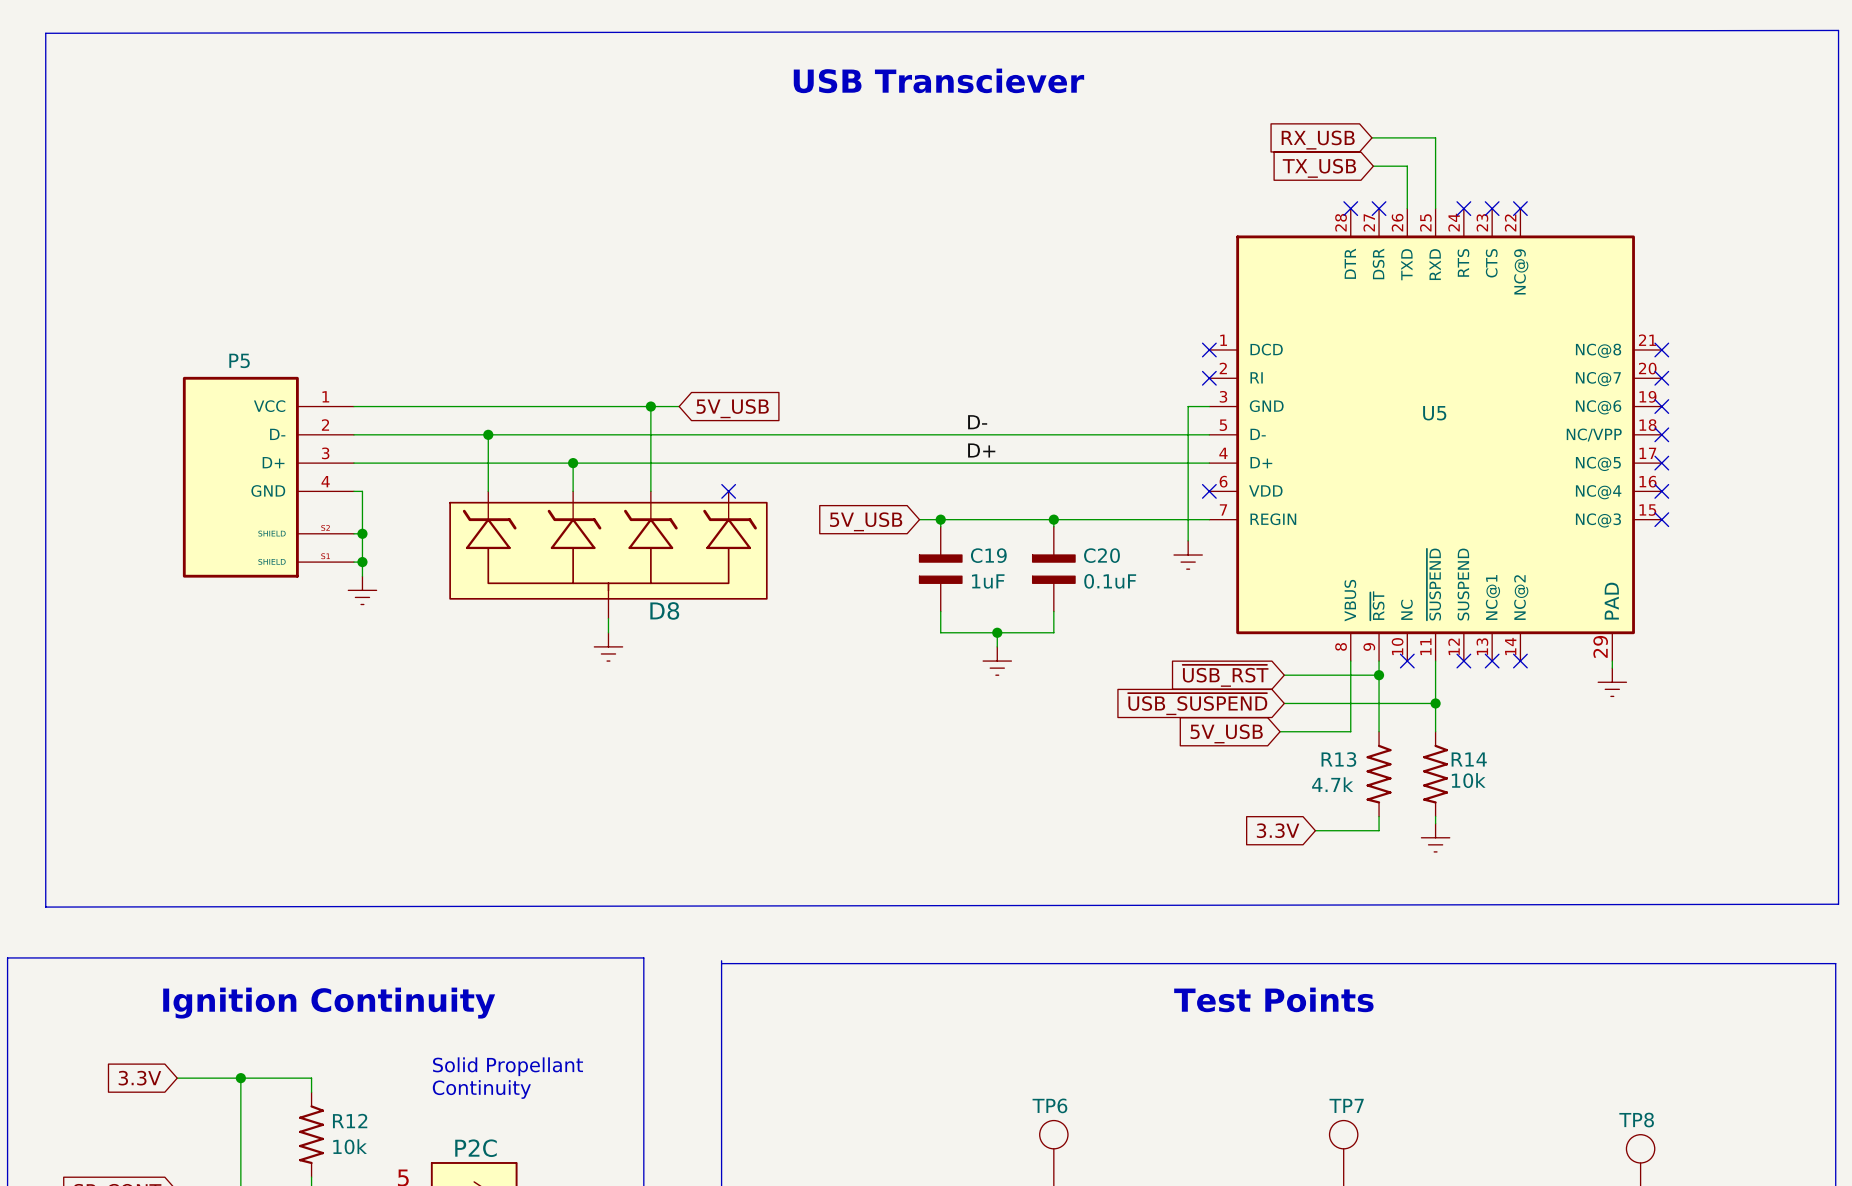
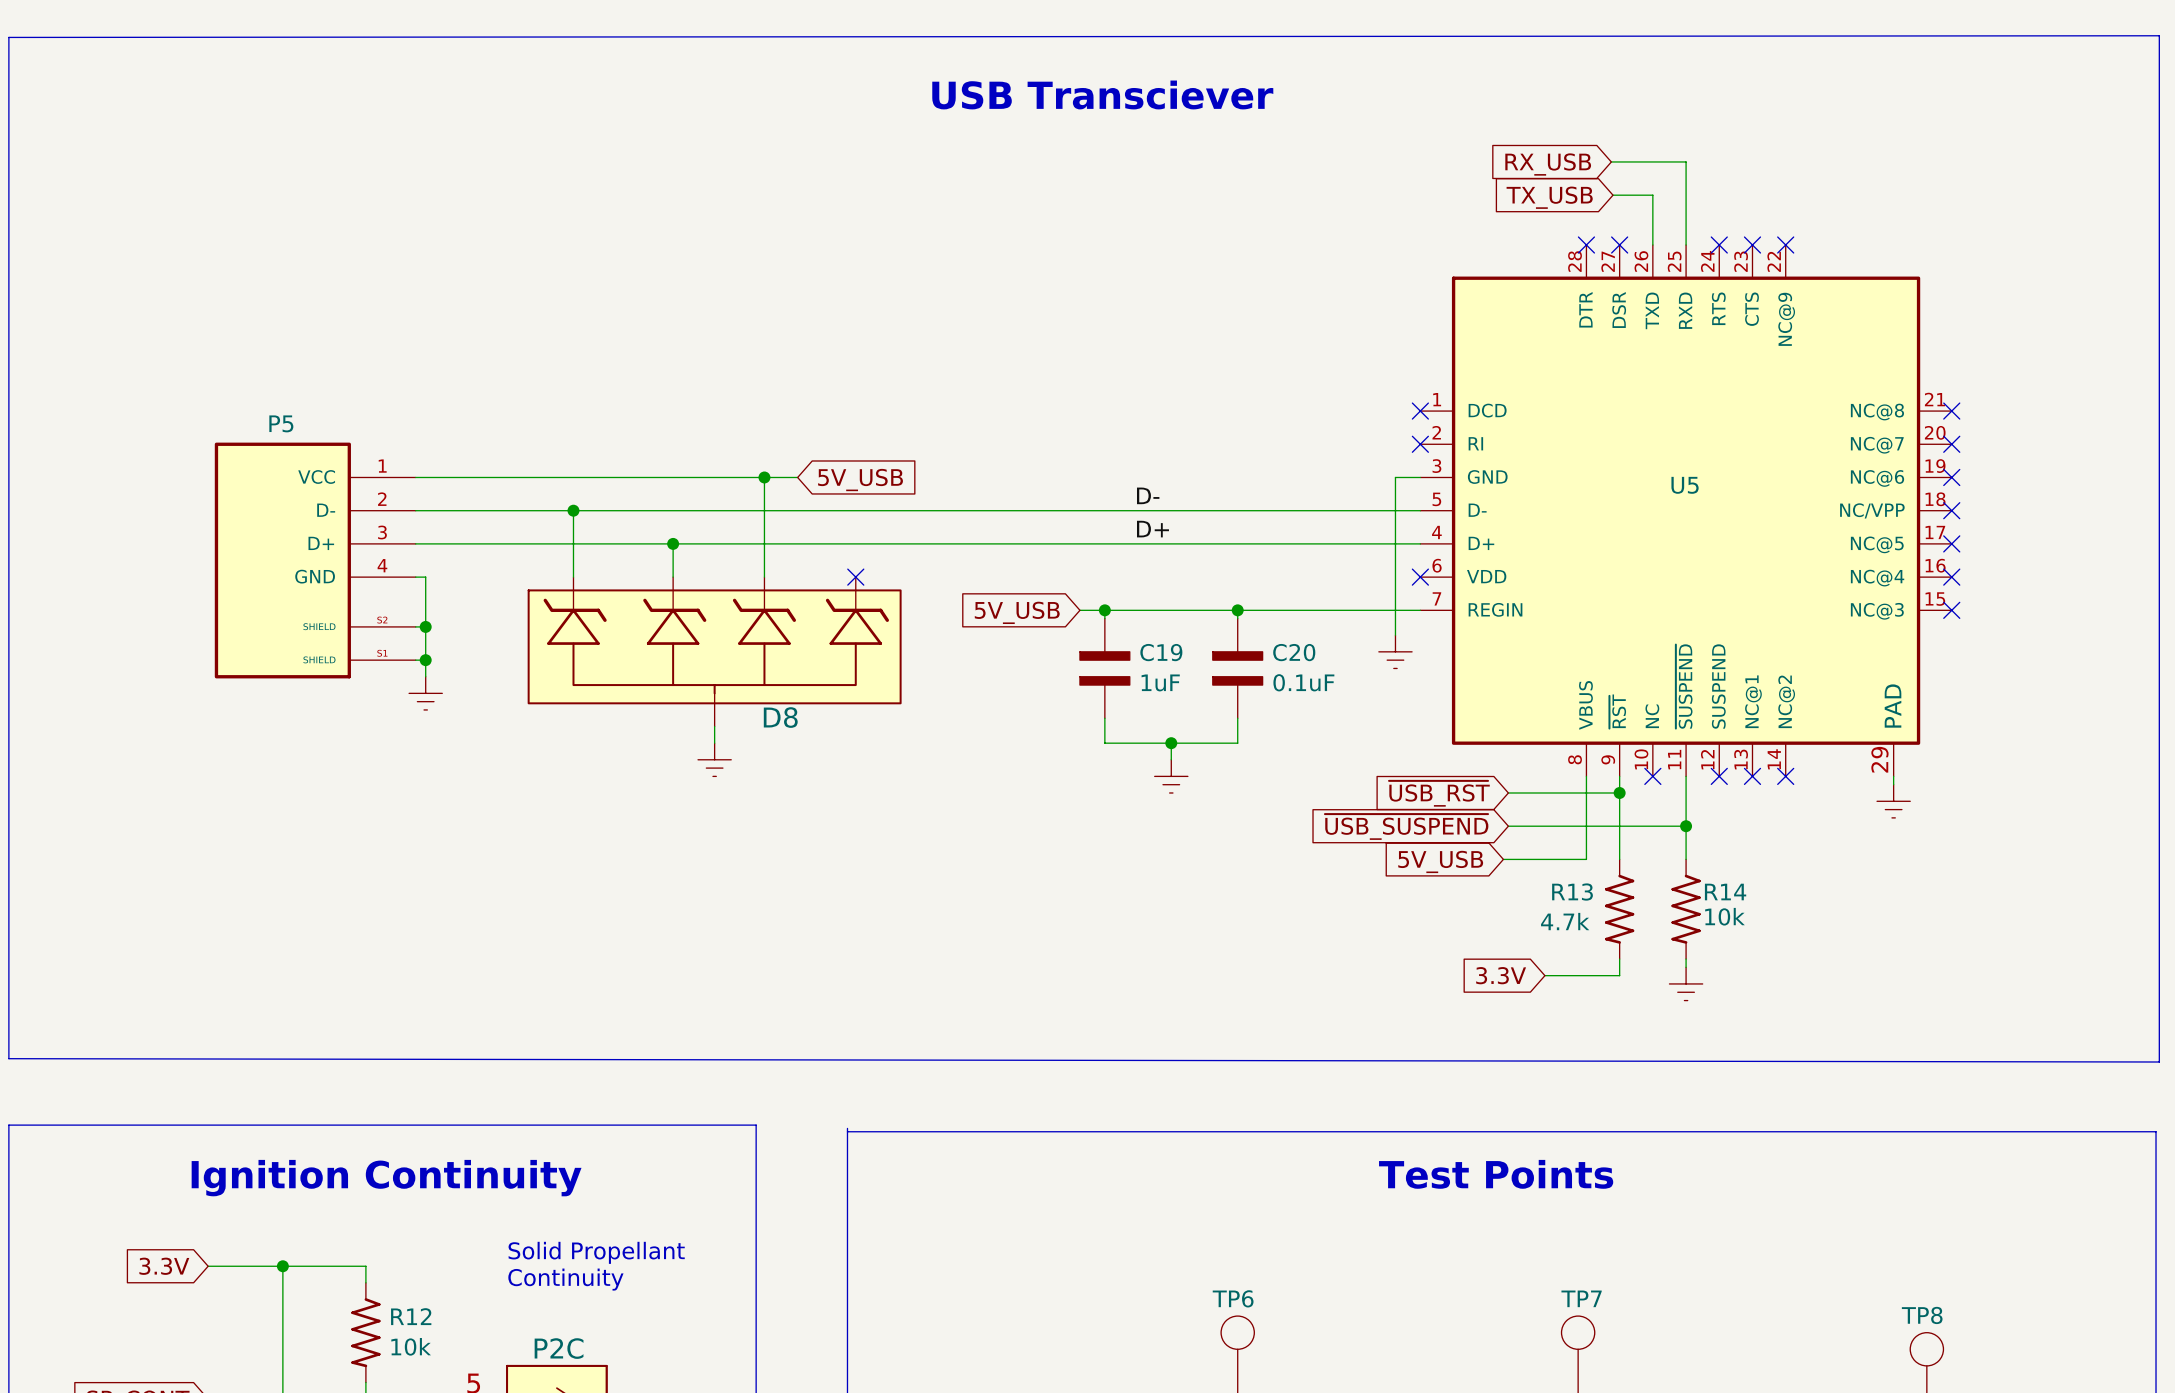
line: (1838, 30) (45, 33) (45, 907) (1838, 904) -> (2159, 35) (8, 37) (8, 1058) (2159, 1062)

